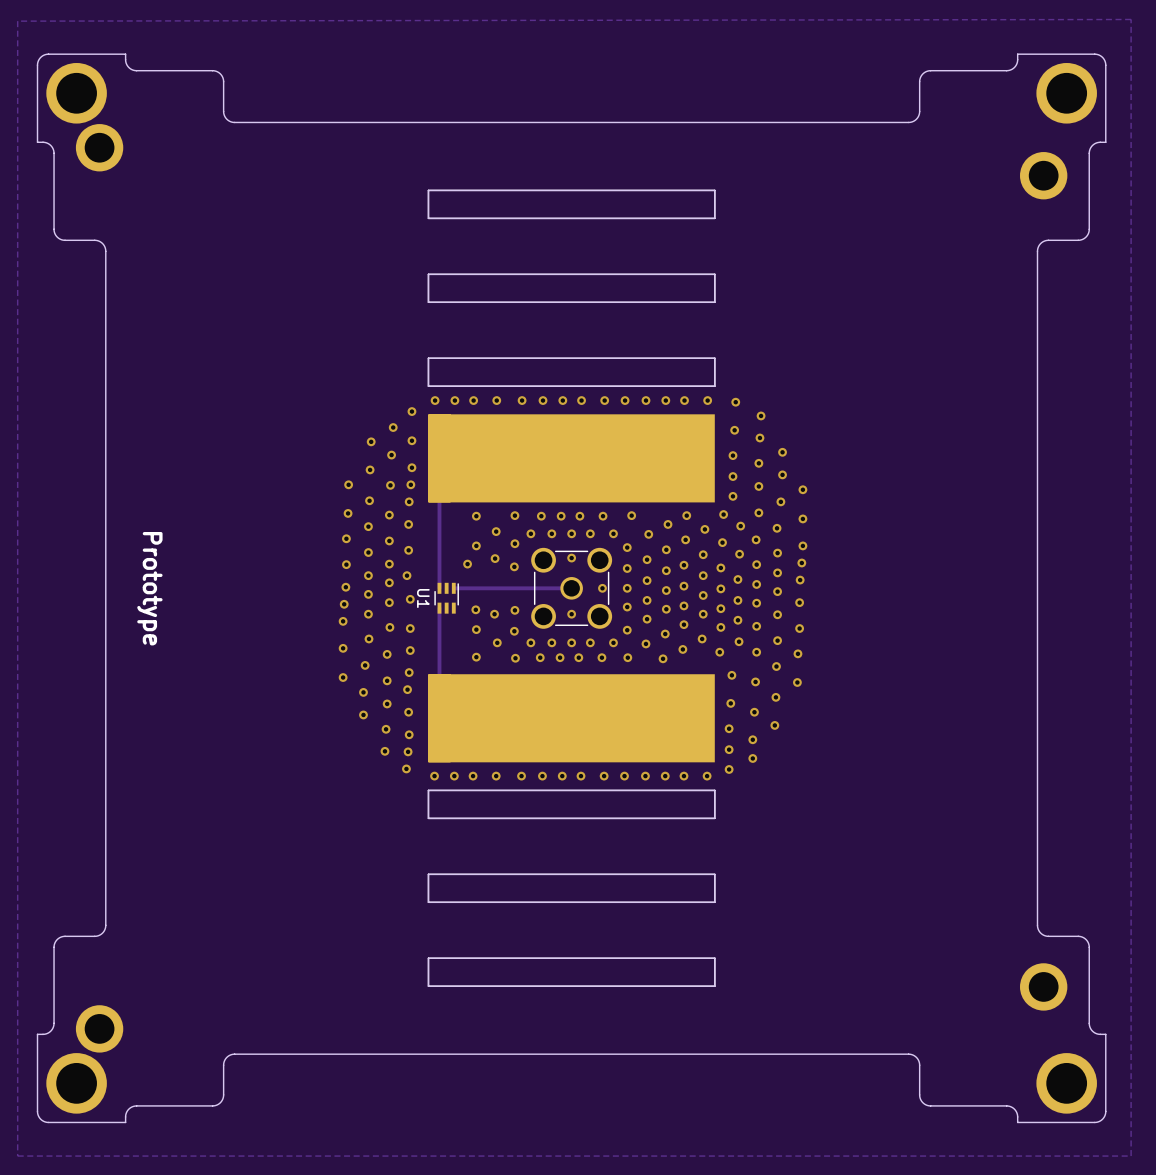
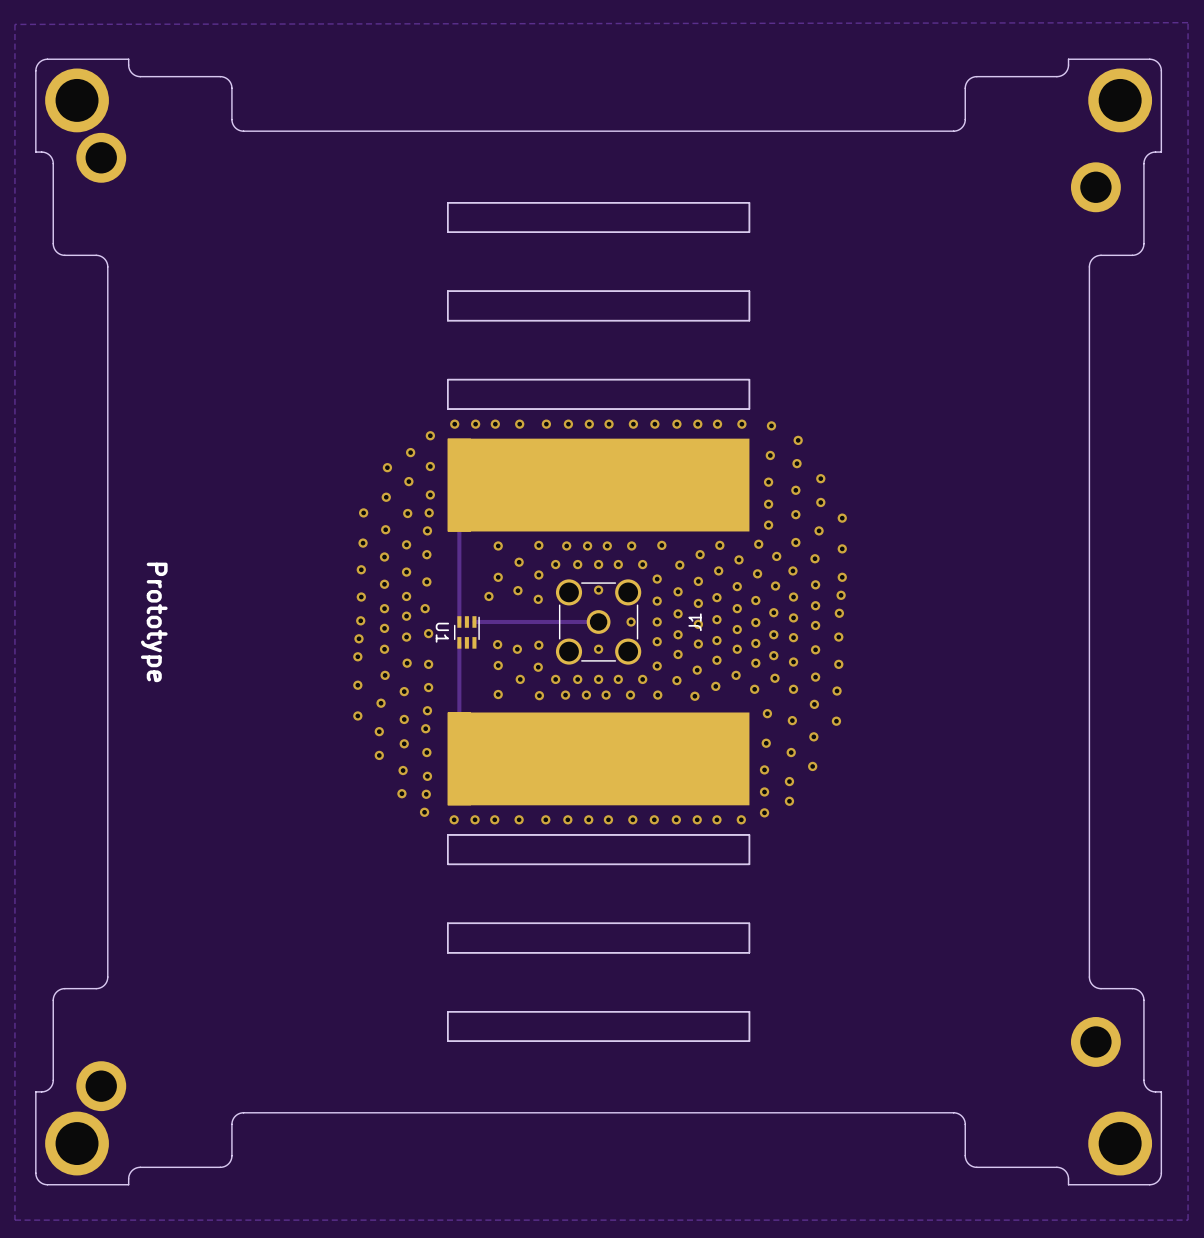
part: (571, 588) -> none
J1: none -> (598, 621)

